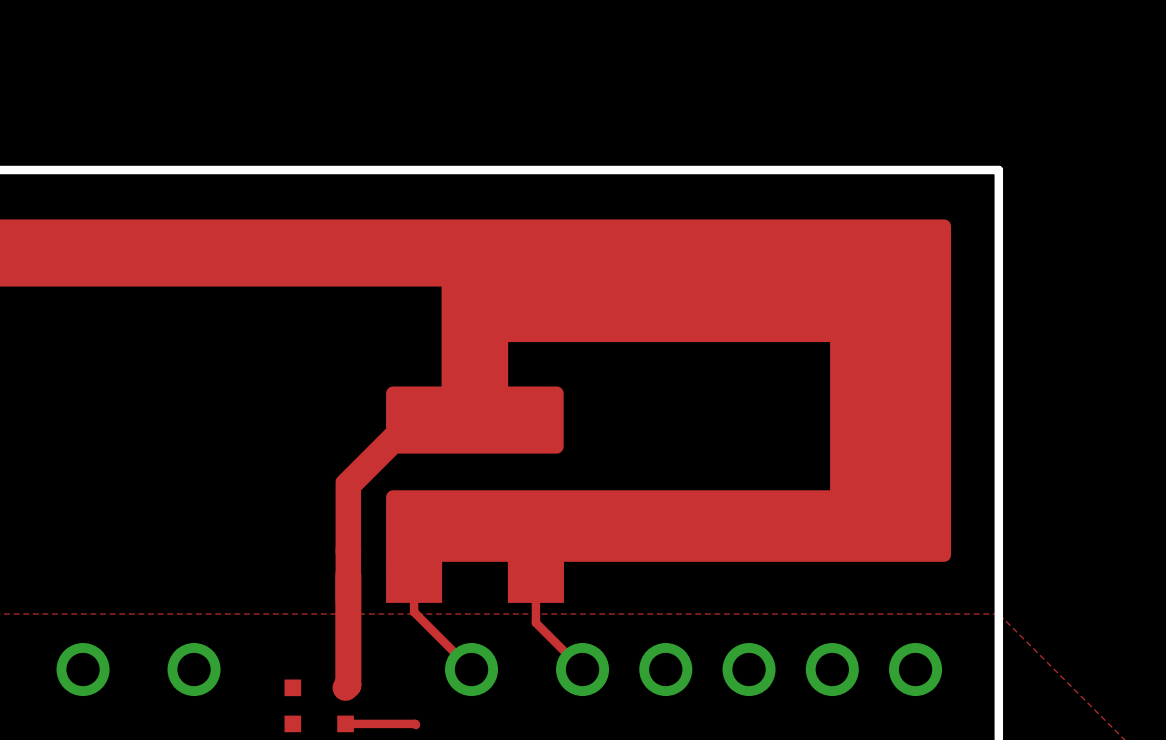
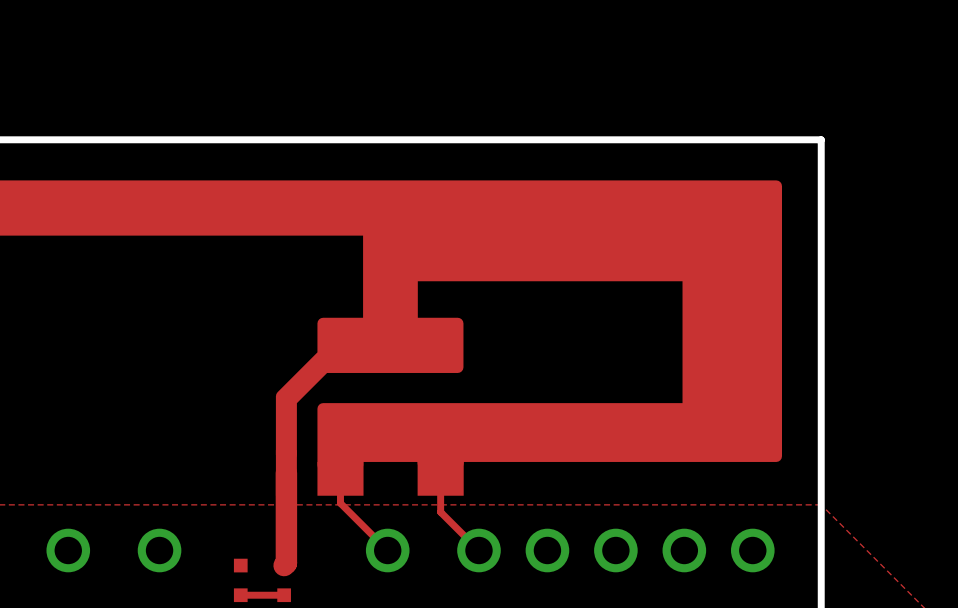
top track: (345, 723) (416, 725) -> (284, 595) (240, 595)

